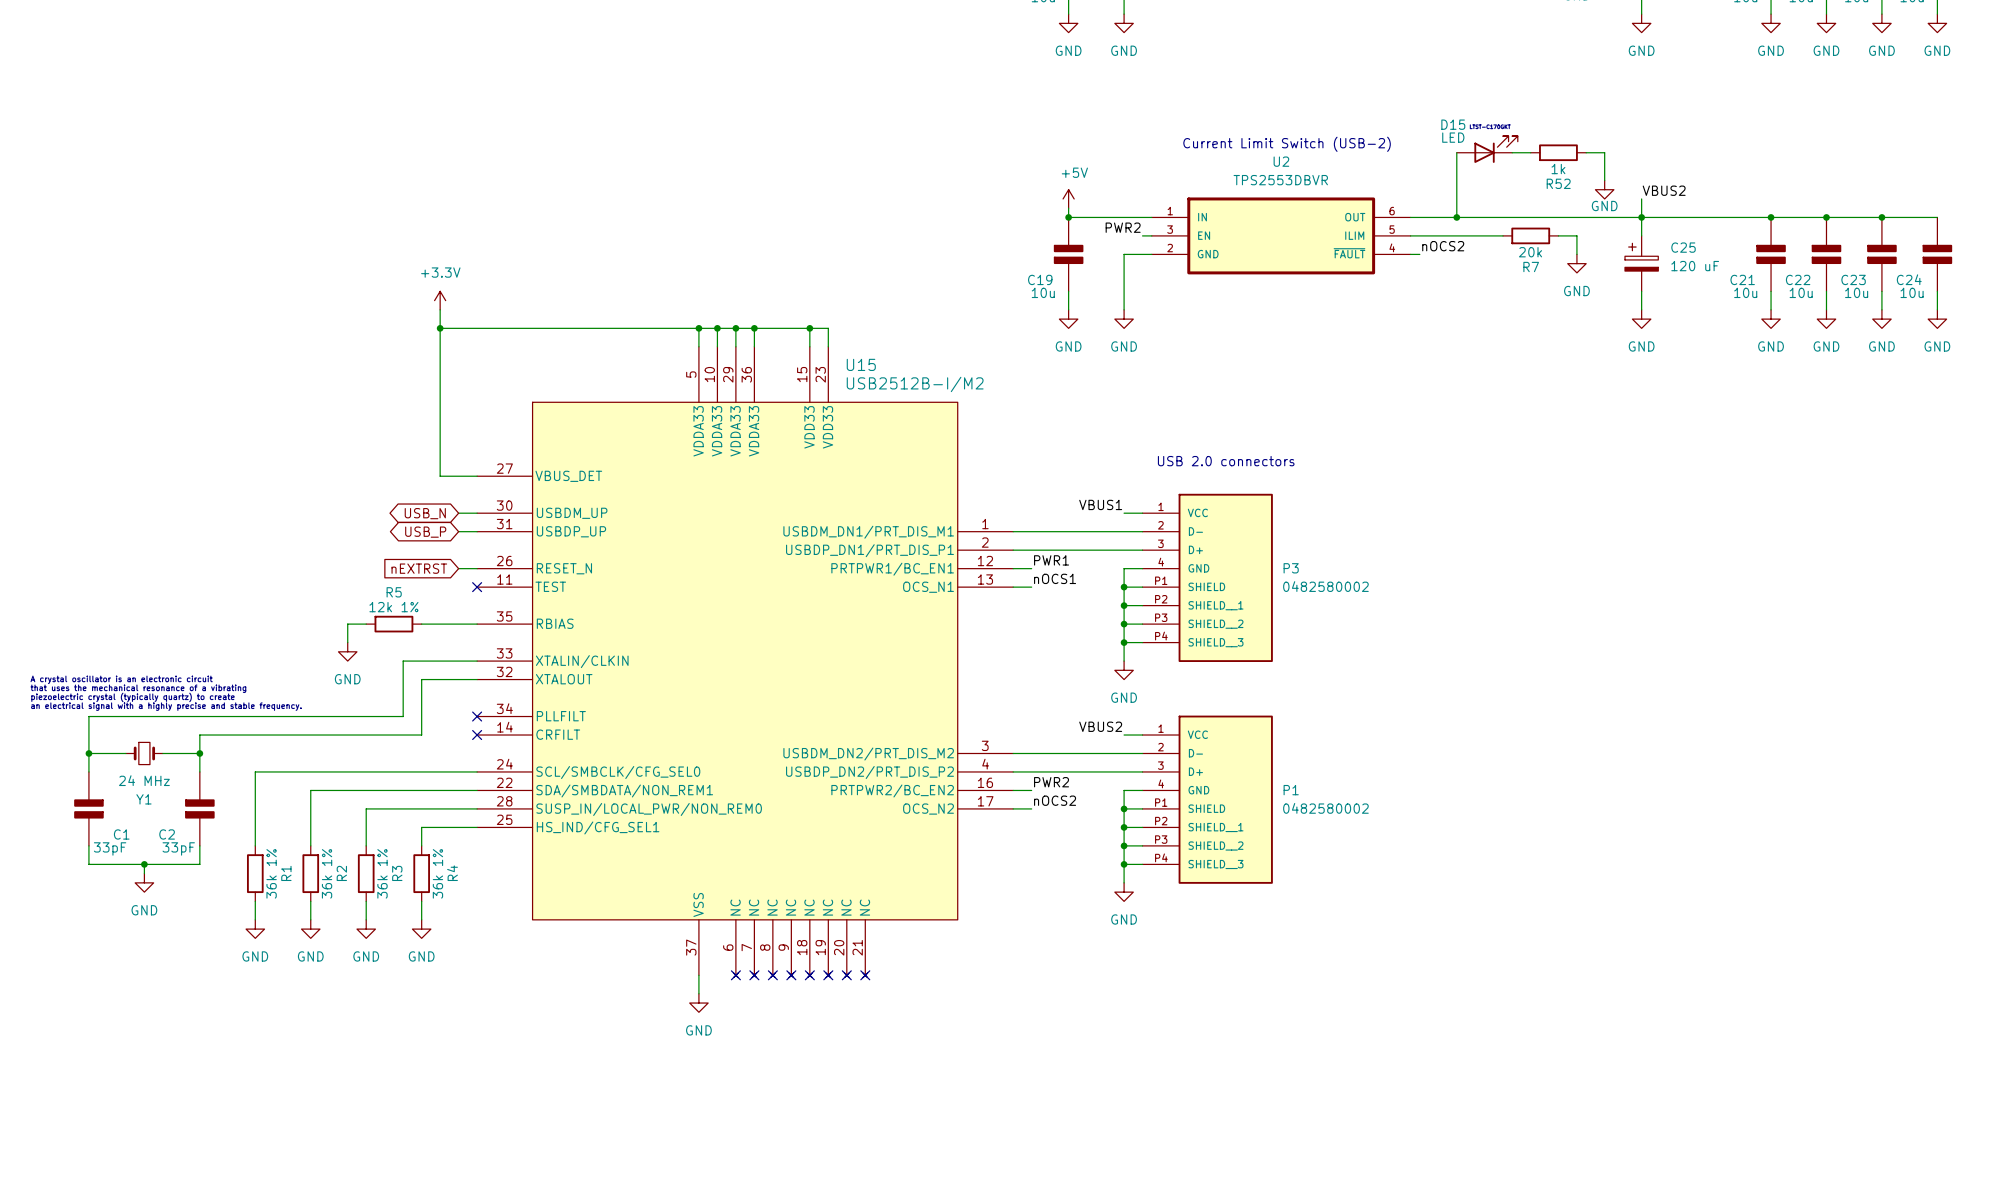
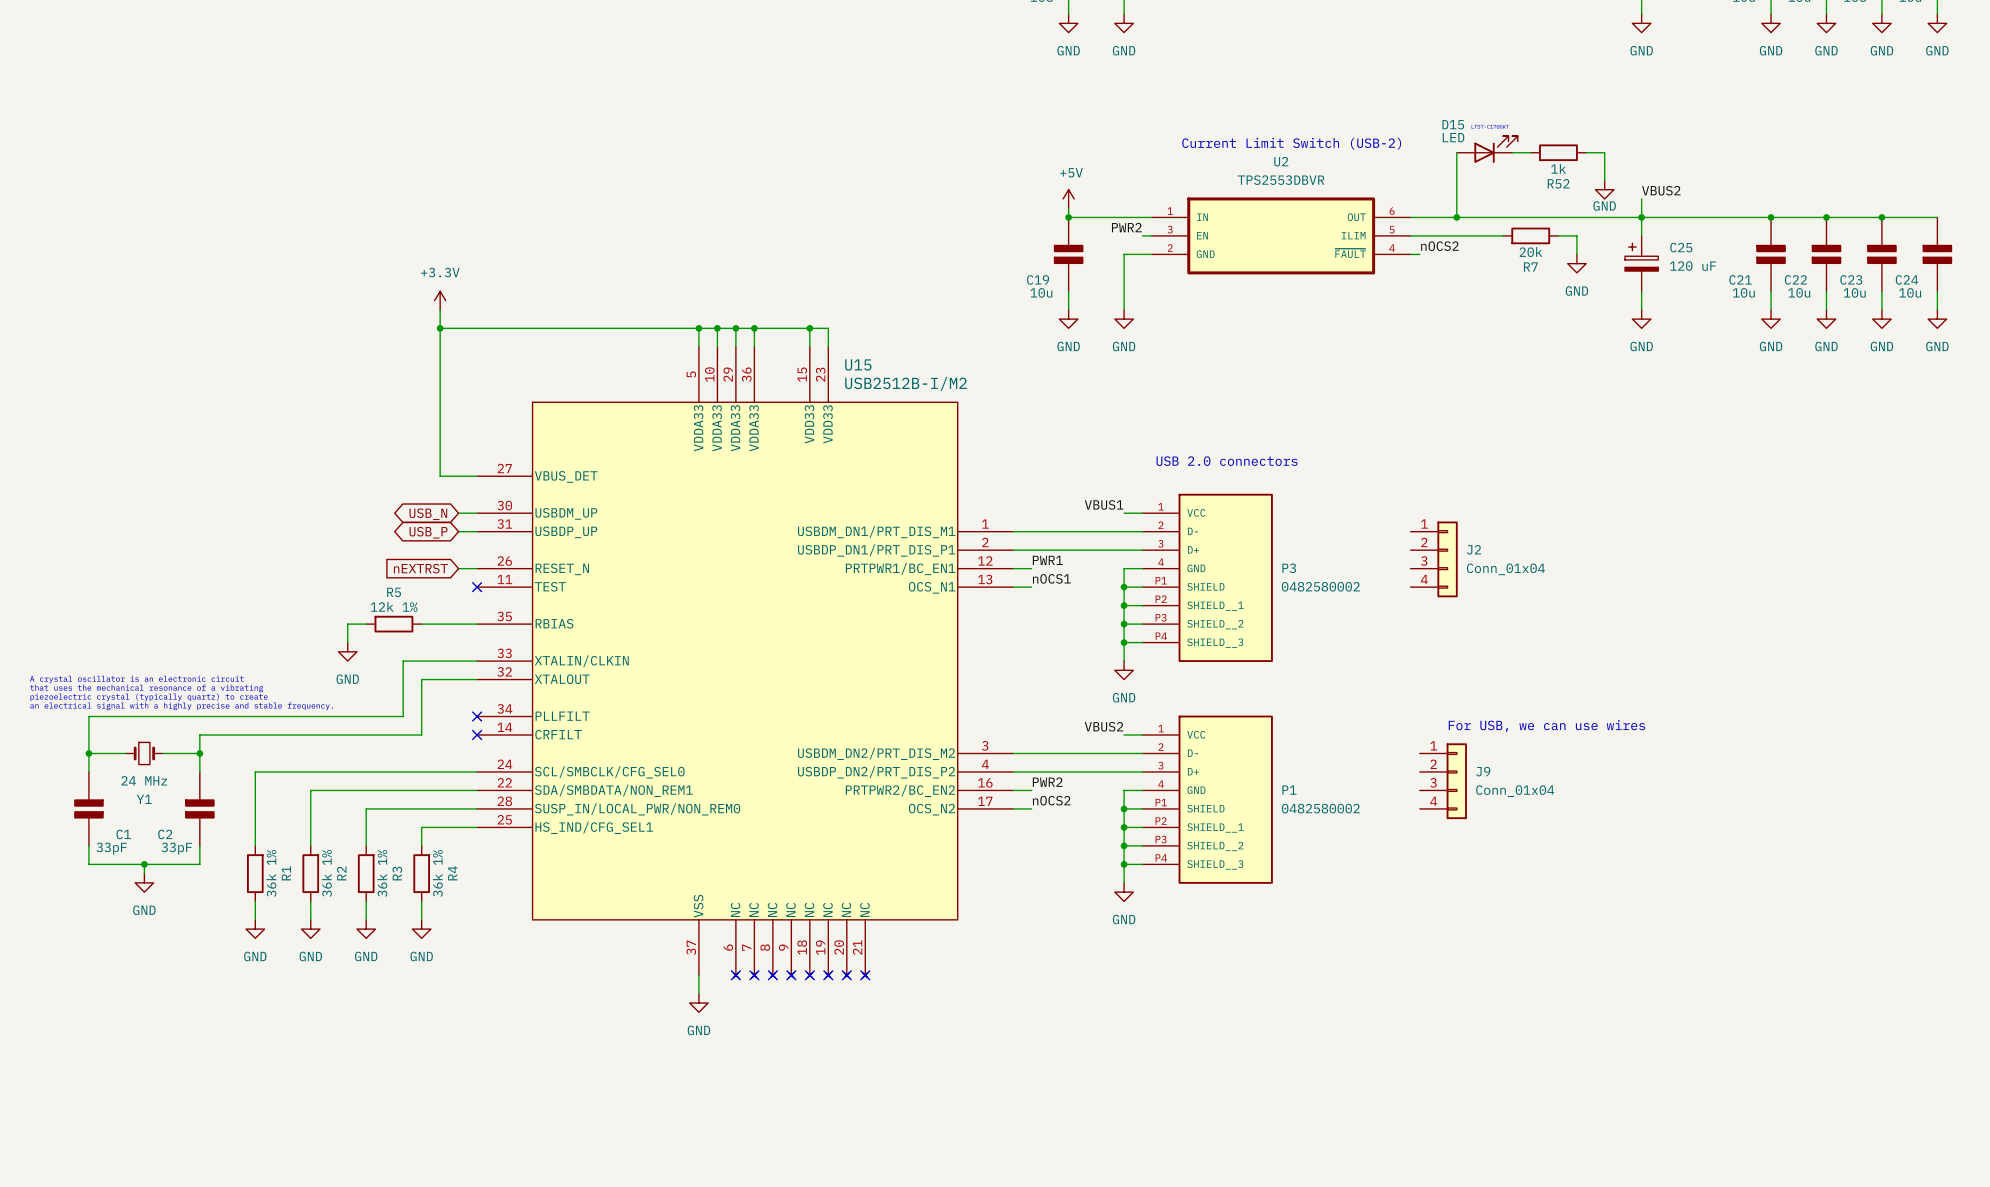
J2: none -> Conn_01x04 (1434, 559)
text: none -> For USB, we can use wires (1546, 726)
J9: none -> Conn_01x04 (1443, 781)

